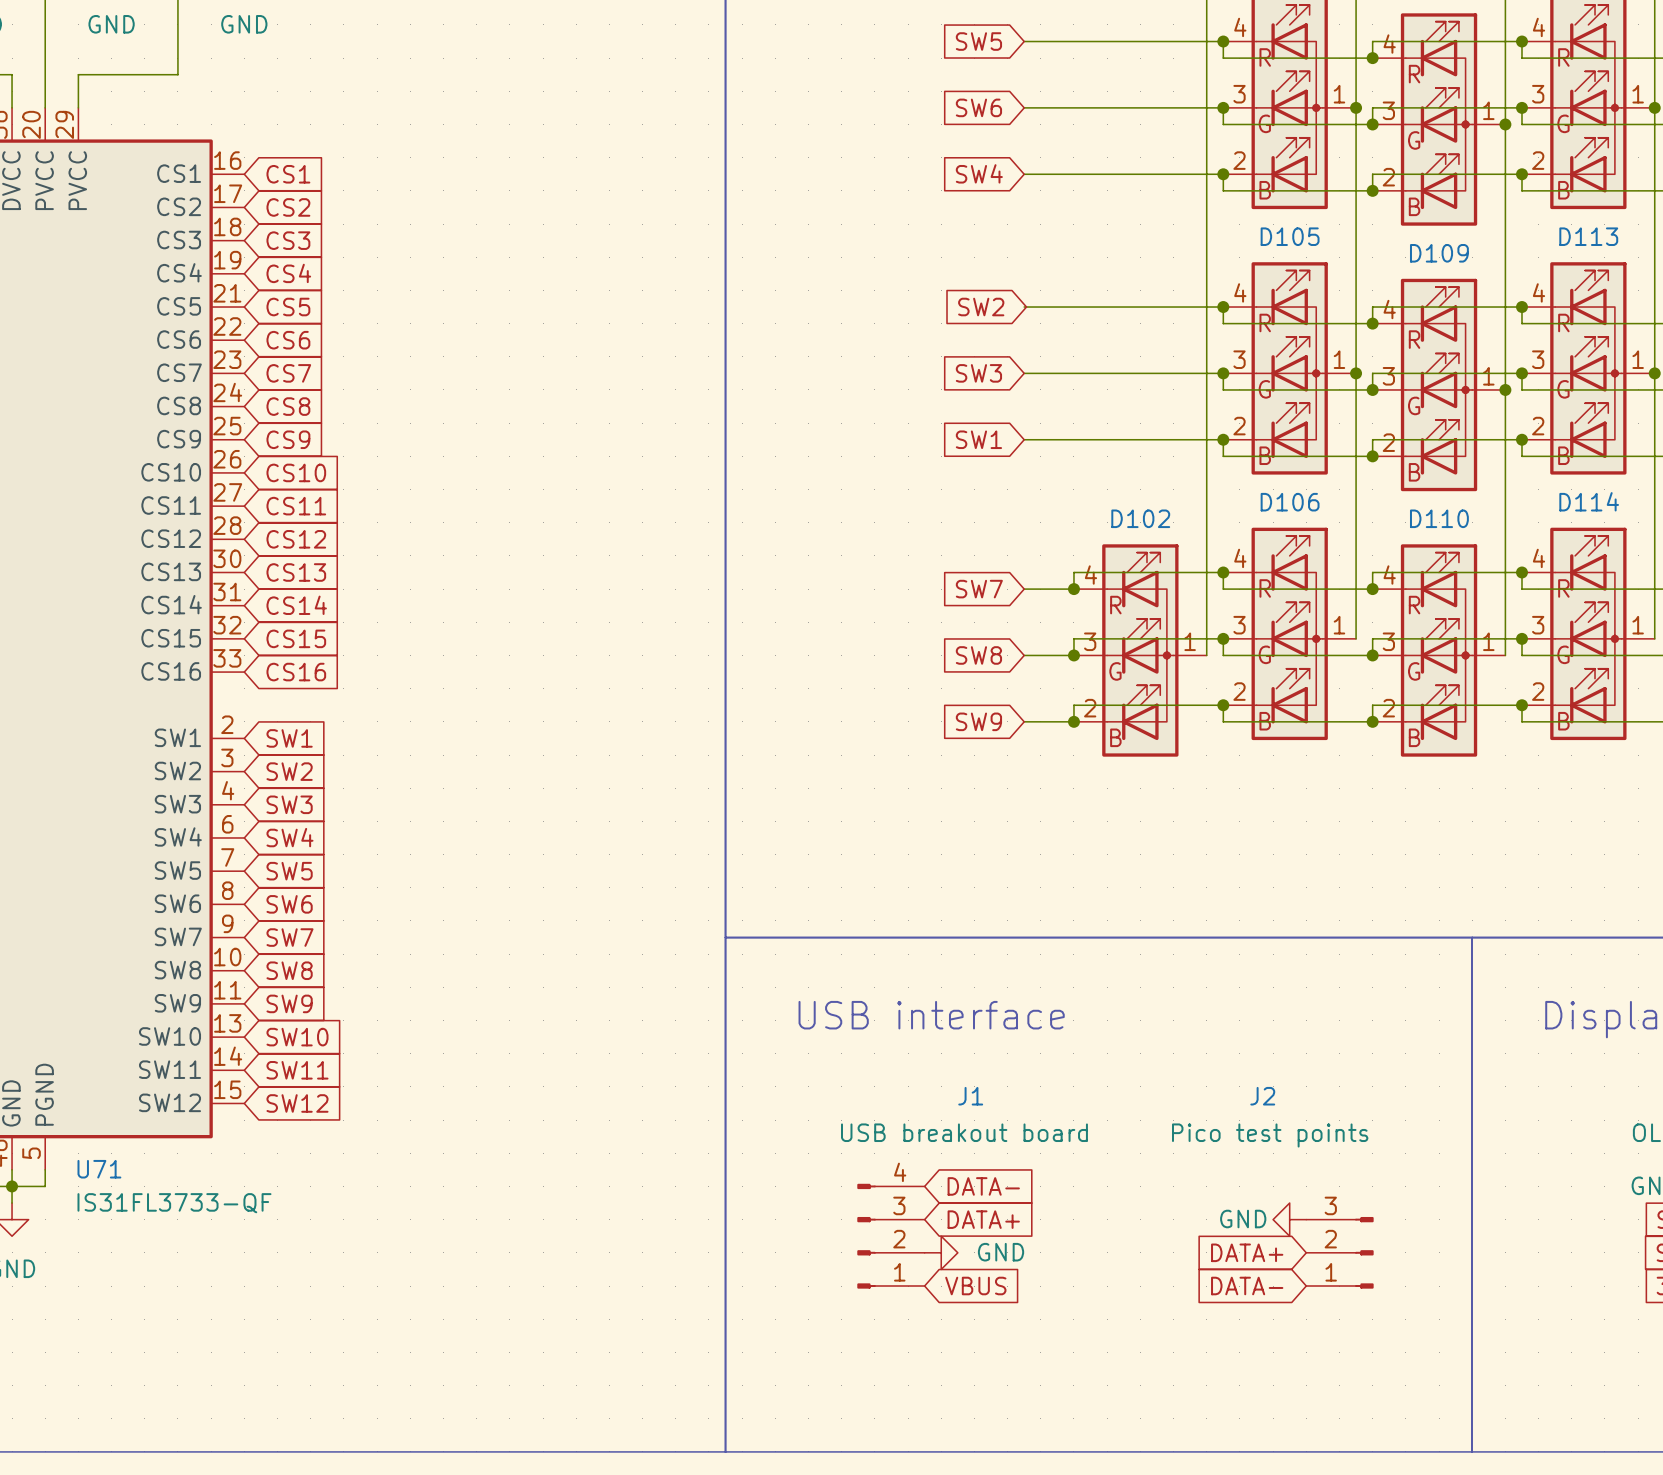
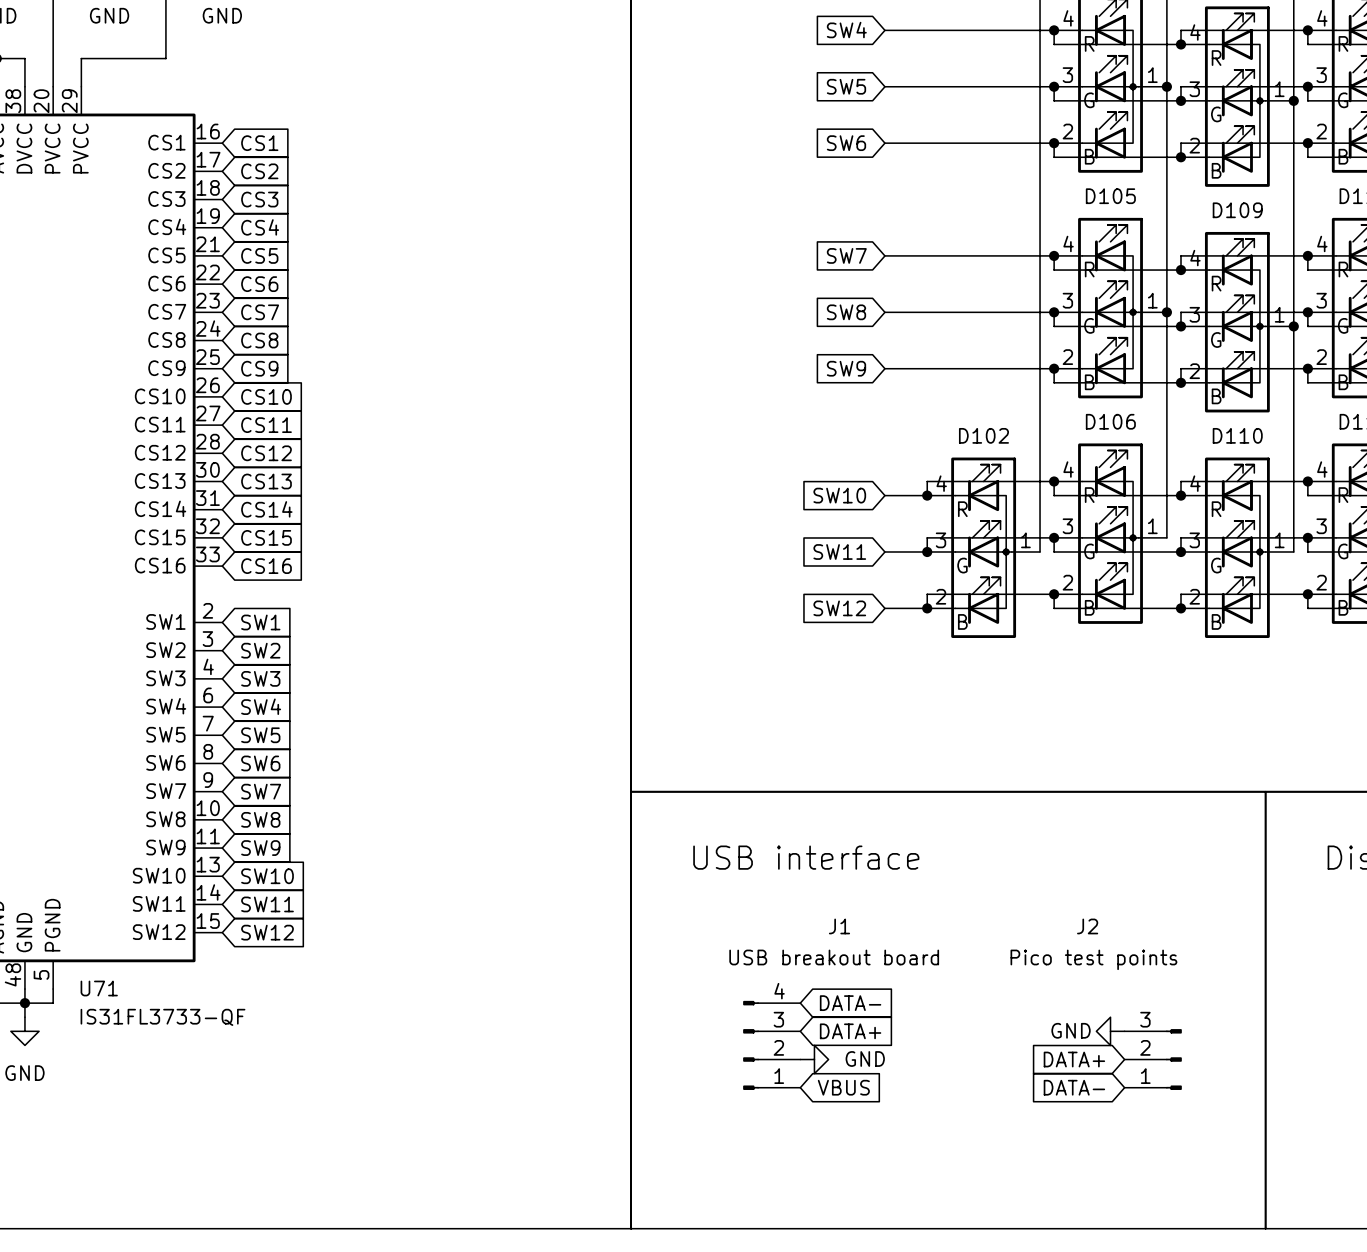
global label: SW5 (978, 41) -> SW4 (846, 30)
global label: SW6 (978, 107) -> SW5 (846, 86)
global label: SW4 (979, 173) -> SW6 (846, 143)
global label: SW2 (981, 307) -> SW7 (846, 255)
global label: SW3 (978, 373) -> SW8 (846, 312)
global label: SW1 (978, 439) -> SW9 (846, 368)
global label: SW7 (979, 589) -> SW10 (839, 495)
global label: SW8 (978, 655) -> SW11 (839, 551)
global label: SW9 (978, 721) -> SW12 (839, 608)

